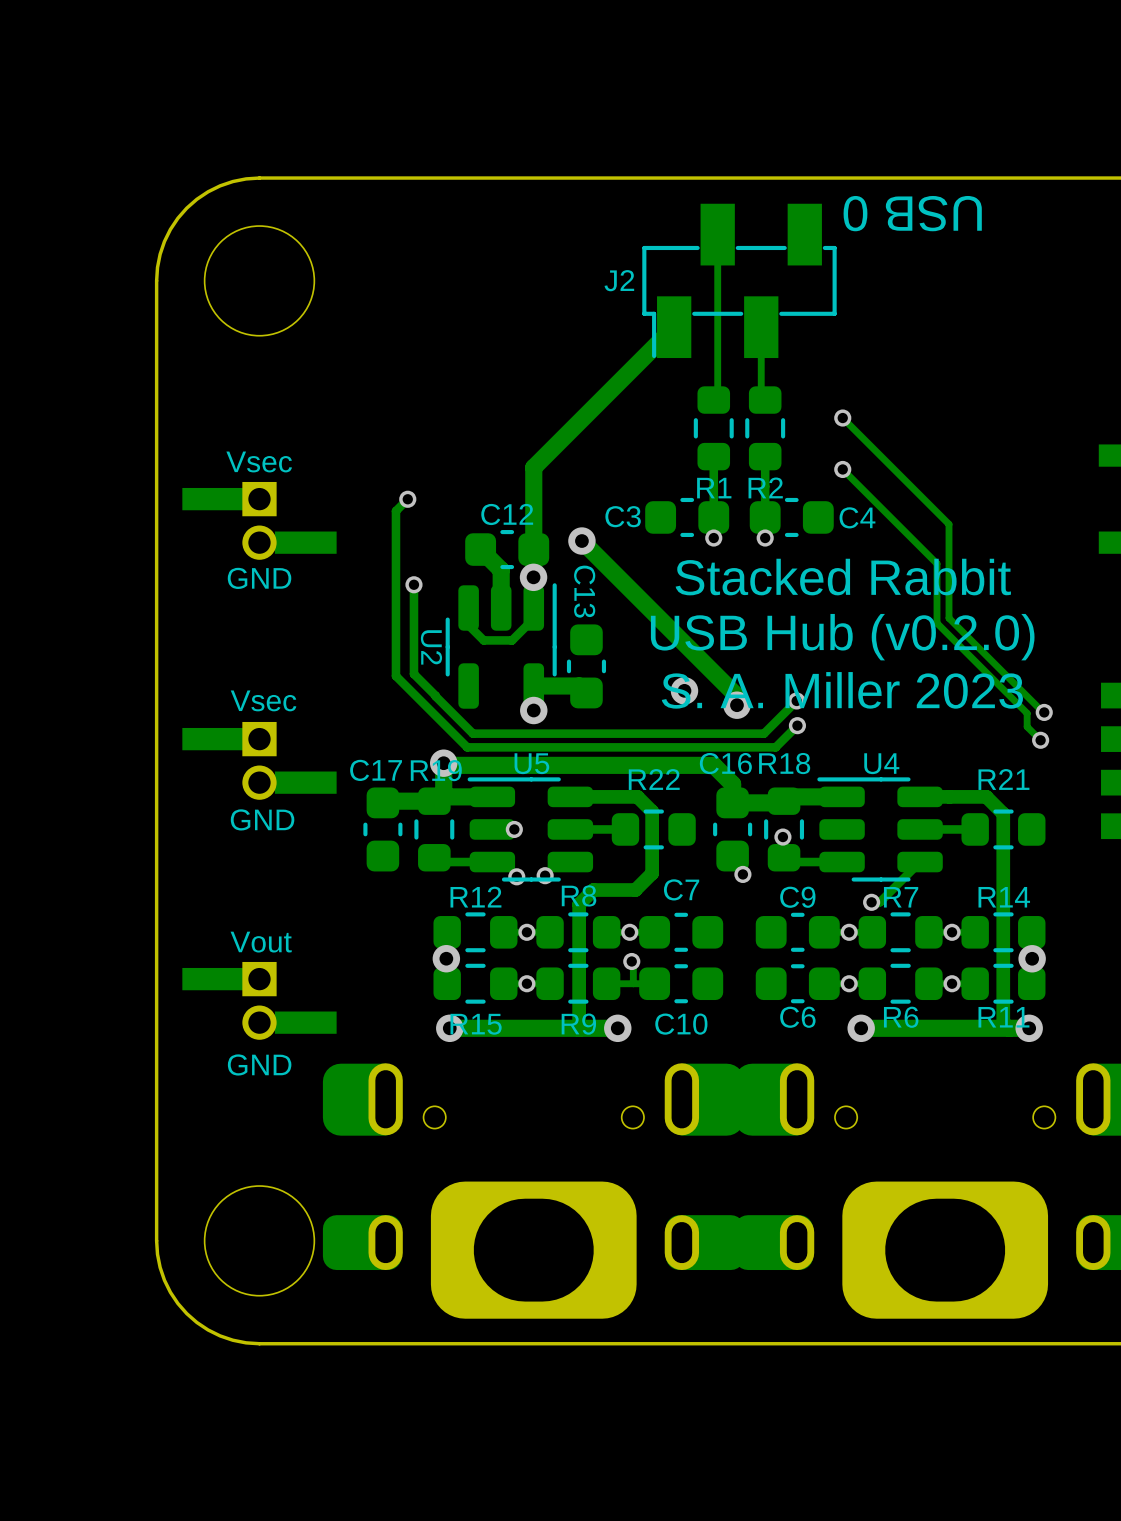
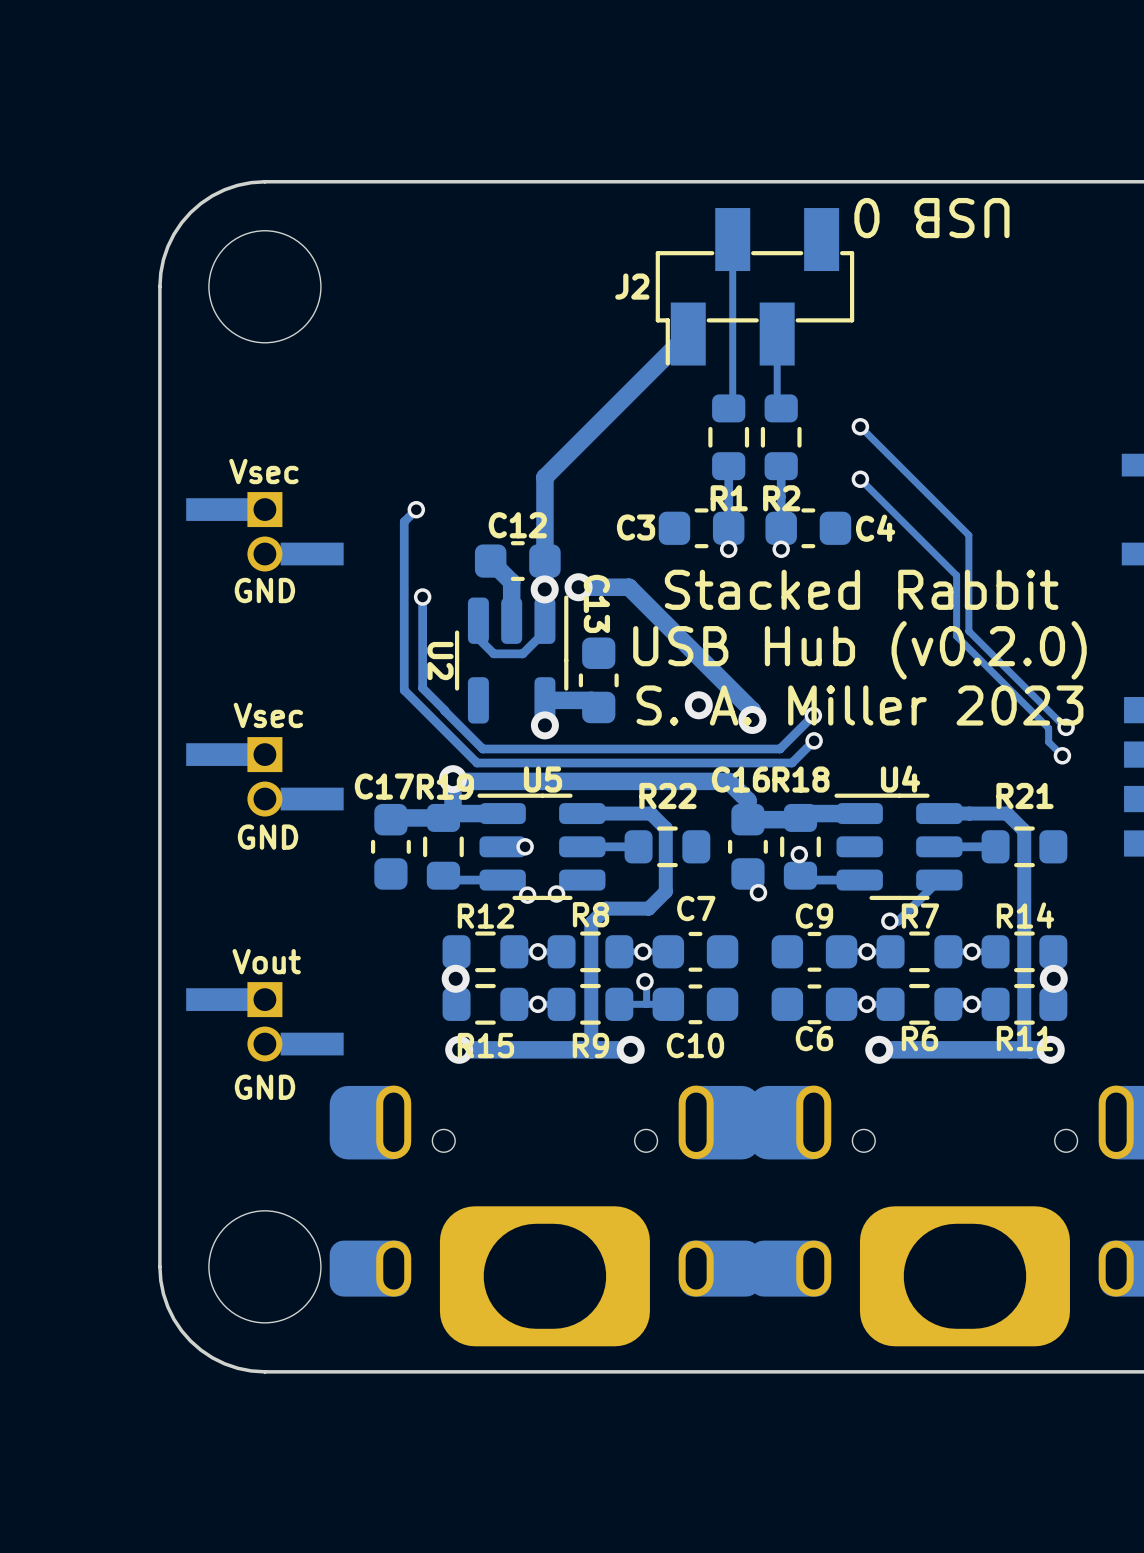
track: (581, 541) (616, 575) -> (578, 587) (629, 587)
via position: (581, 541) -> (578, 587)

